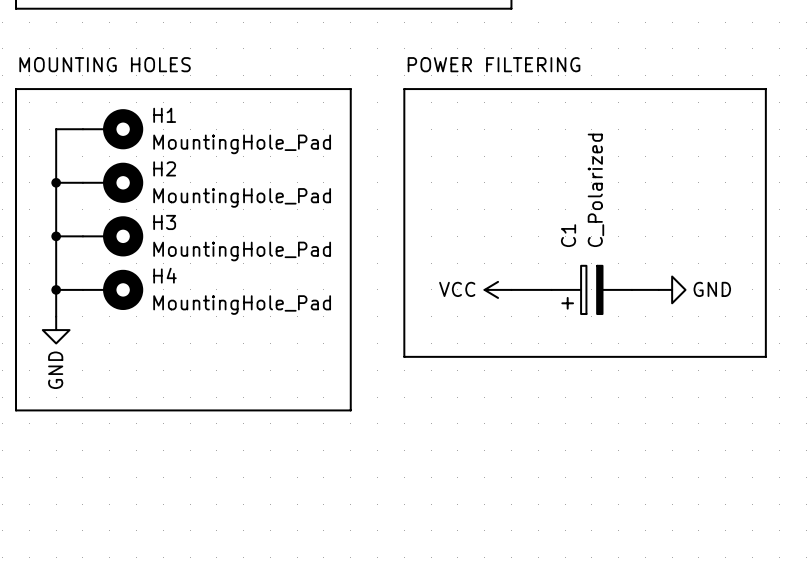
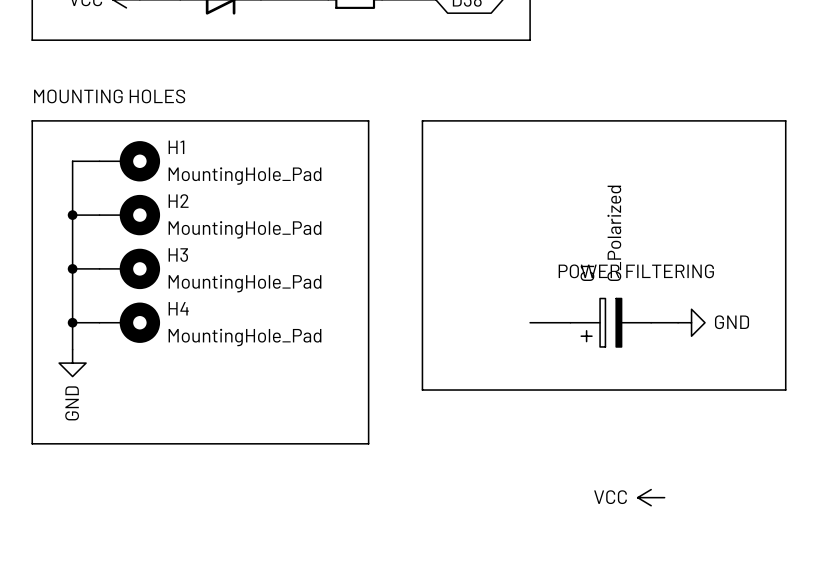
text position: POWER FILTERING (494, 64) -> POWER FILTERING (636, 271)
power symbol position: VCC (498, 289) -> VCC (651, 497)

